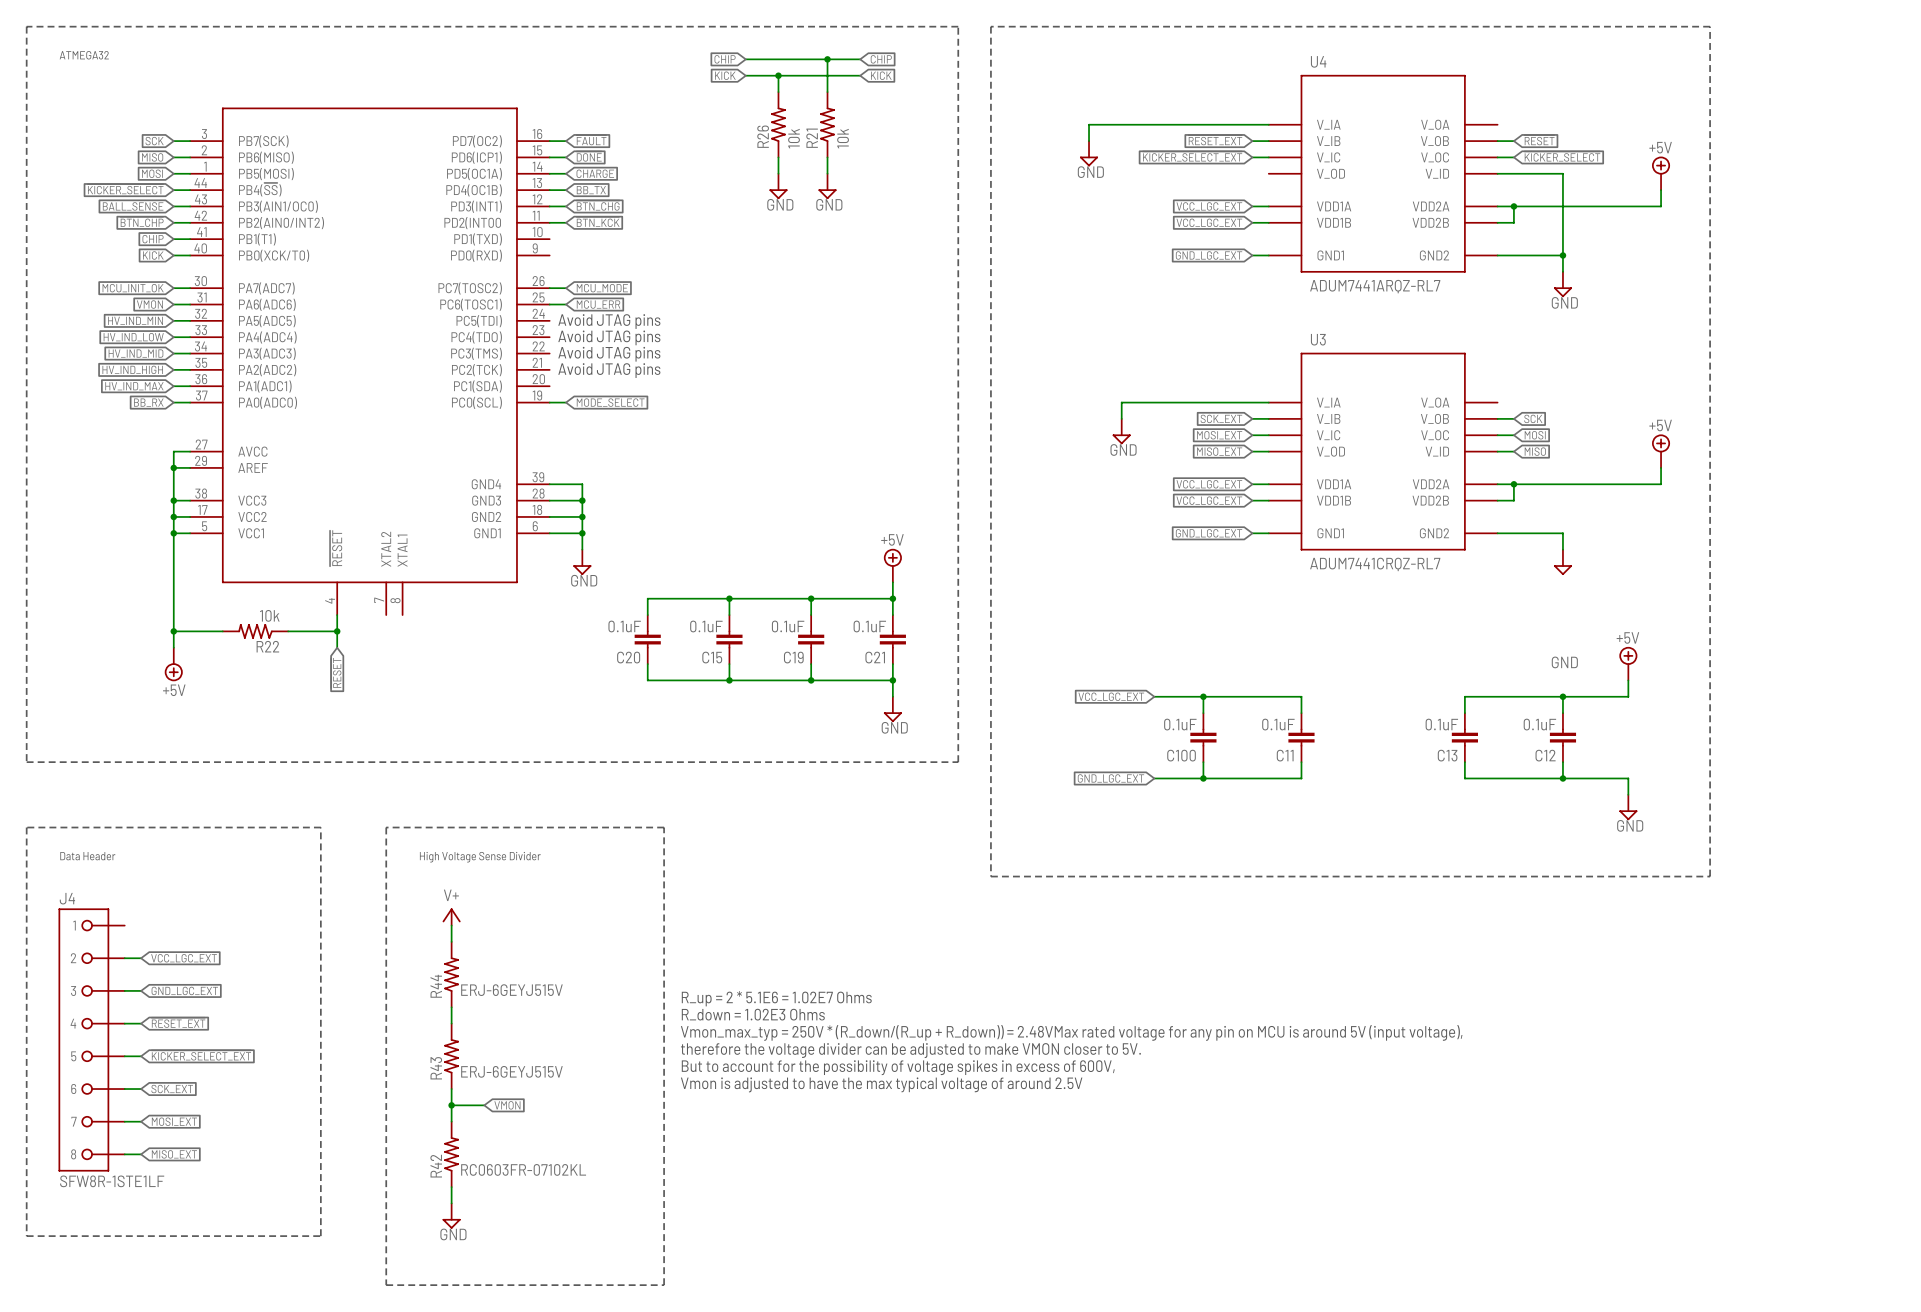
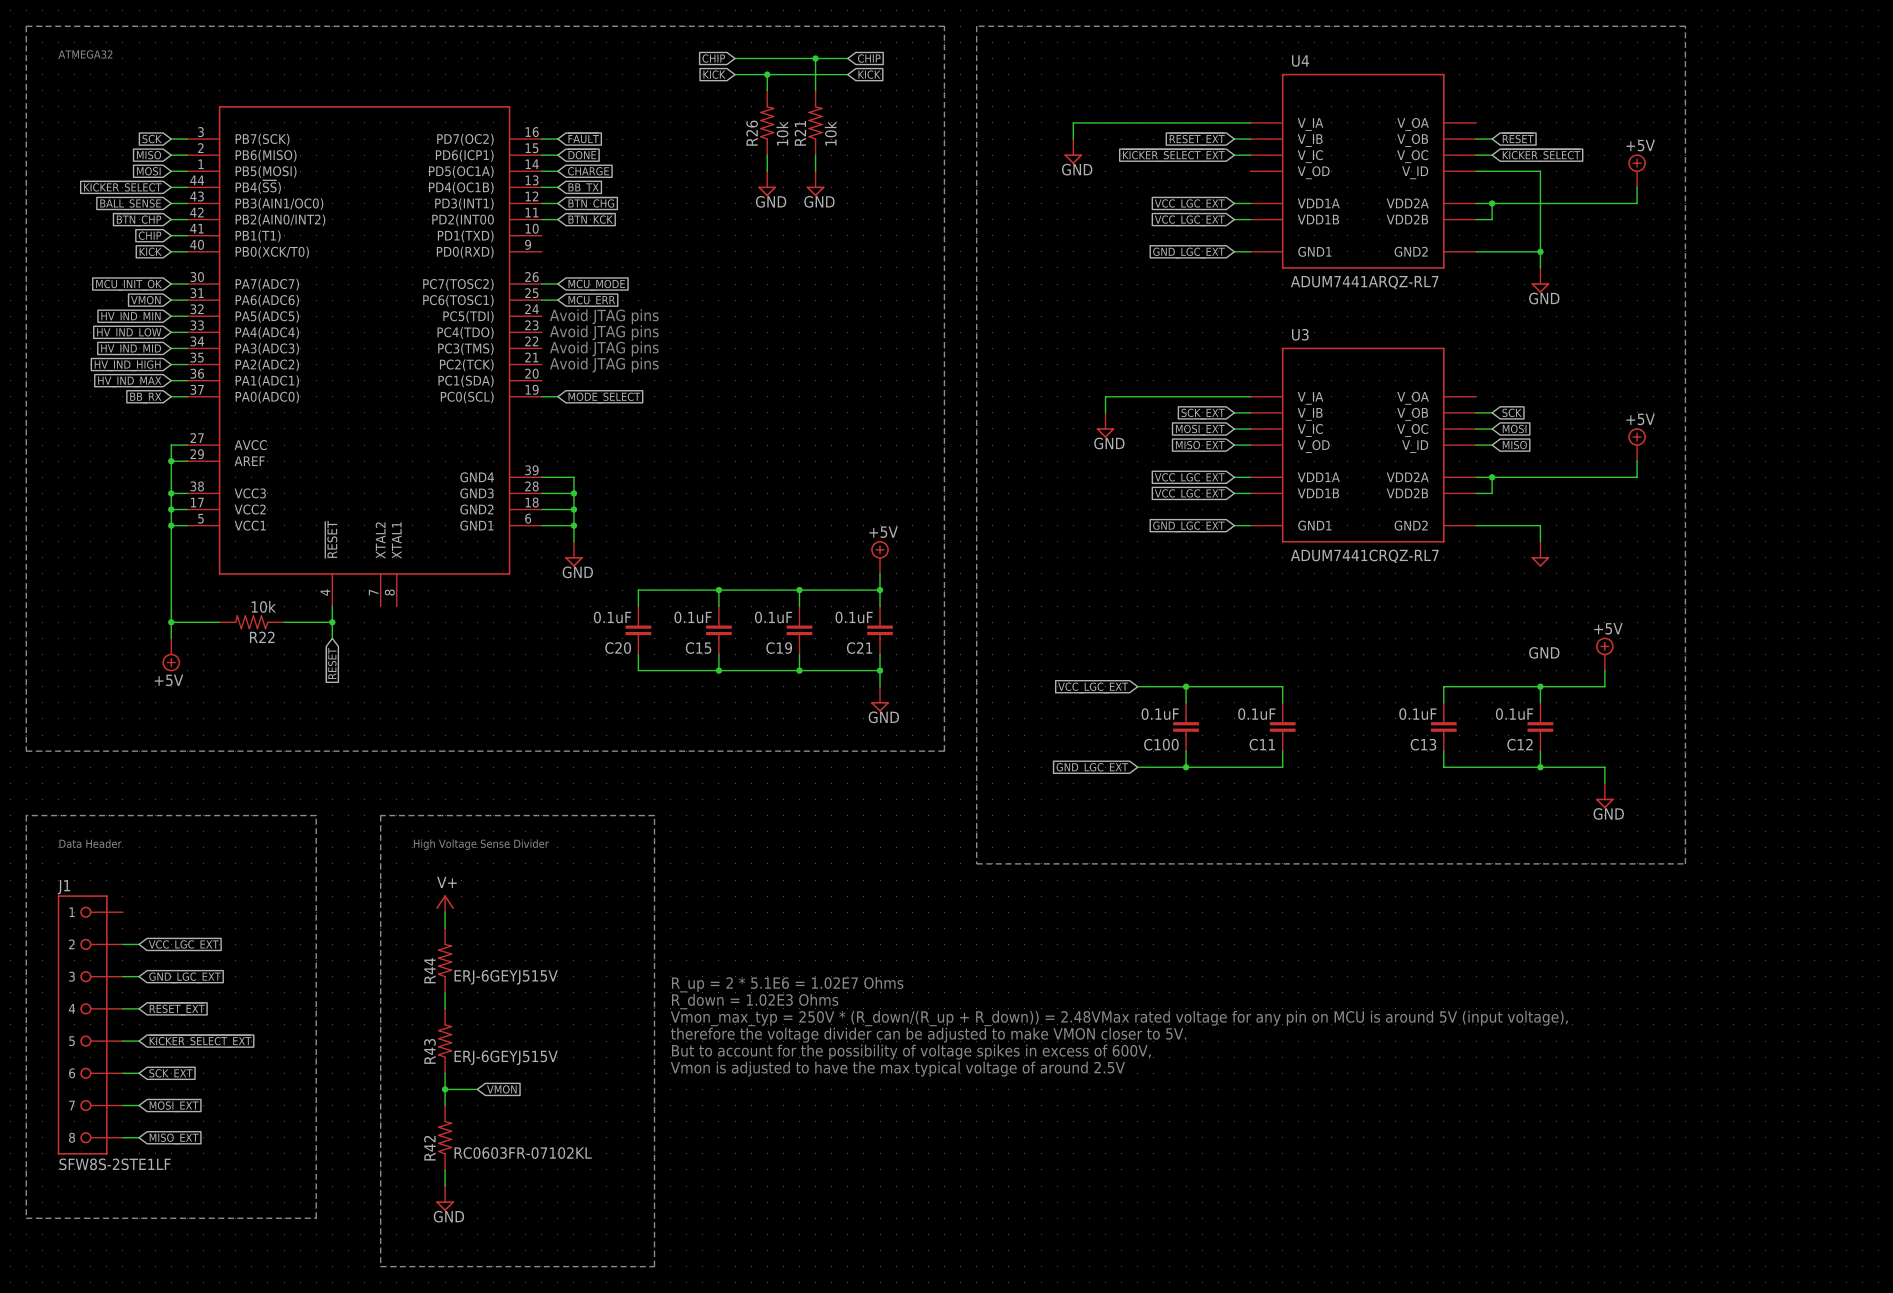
J4 name: J4 (67, 898) -> J1 (63, 887)
J4 value: SFW8R-1STE1LF (112, 1181) -> SFW8S-2STE1LF (115, 1164)

